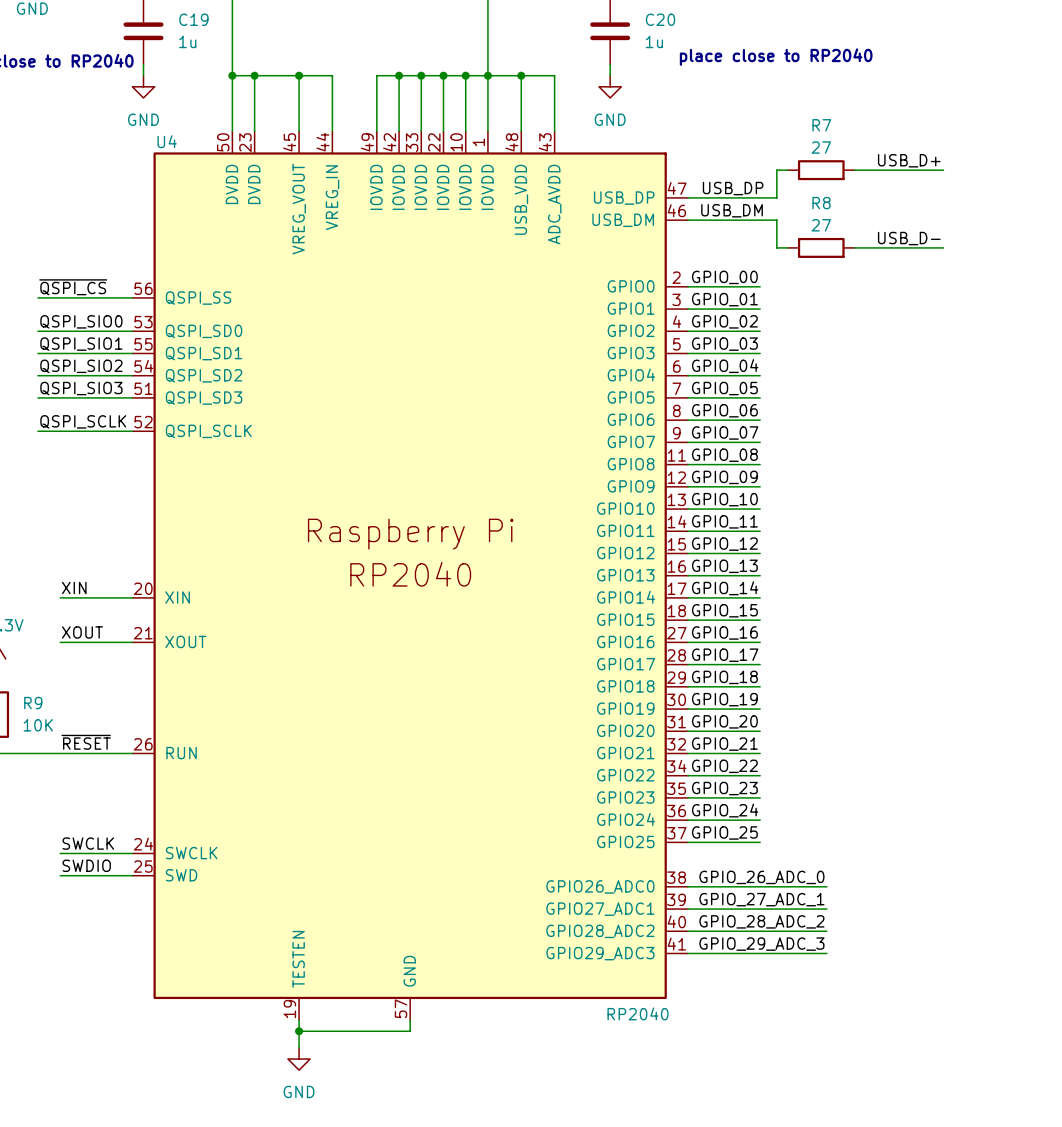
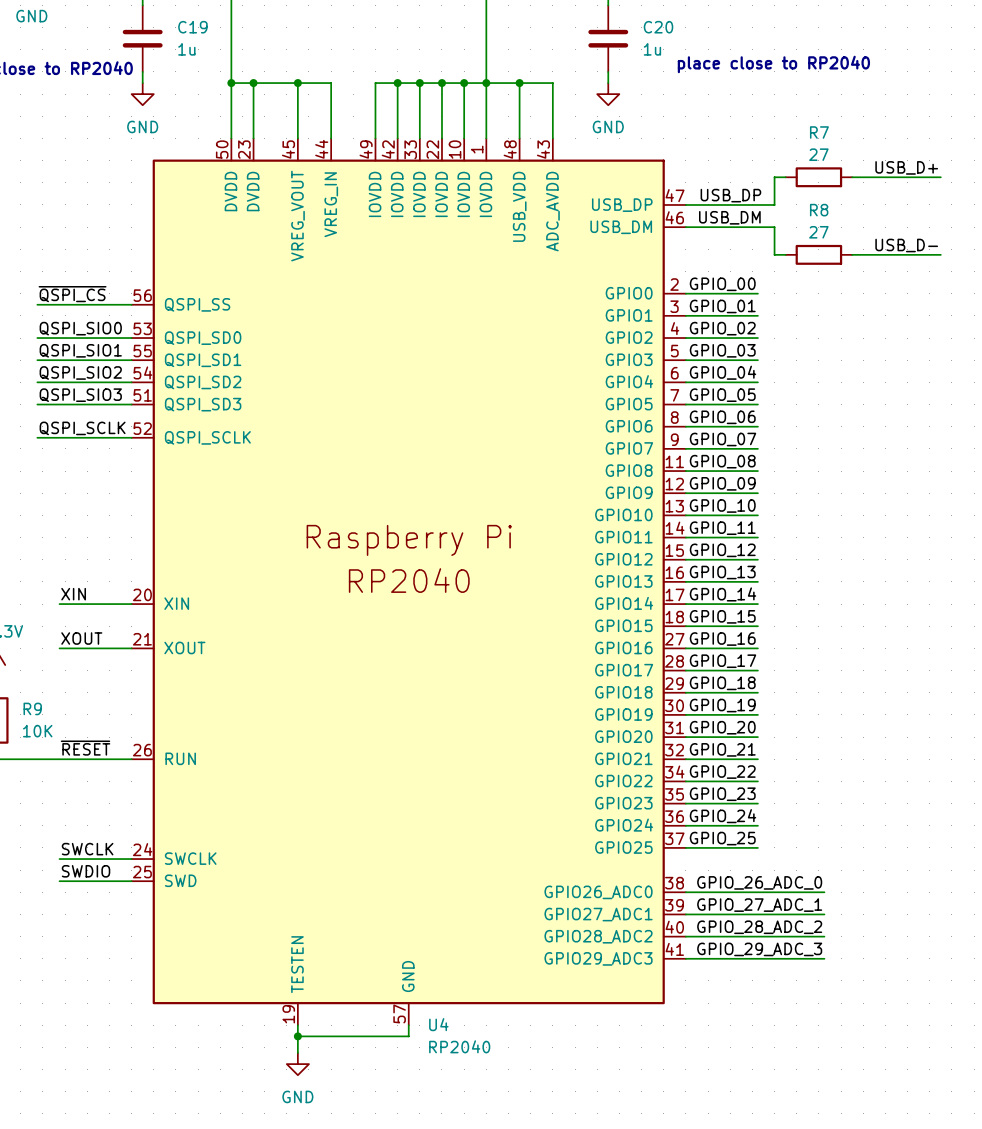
U4 name position: U4 (167, 141) -> U4 (438, 1024)
U4 value position: RP2040 (638, 1013) -> RP2040 (459, 1046)

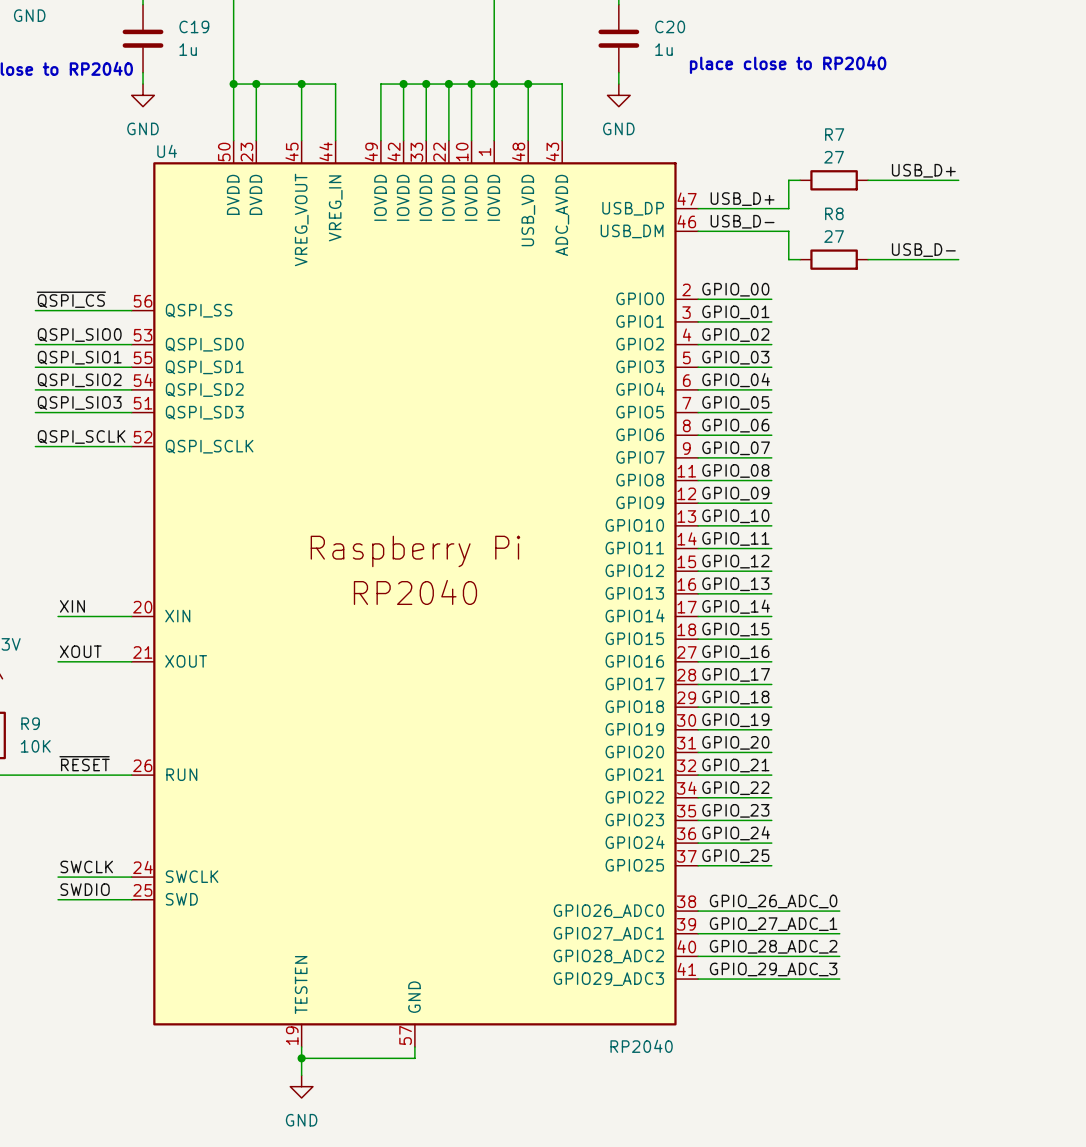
label: USB_DP (730, 195) -> USB_D+ (742, 199)
label: USB_DM (729, 217) -> USB_D- (742, 221)
U4 name position: U4 (438, 1024) -> U4 (167, 151)
U4 value position: RP2040 (459, 1046) -> RP2040 (641, 1046)

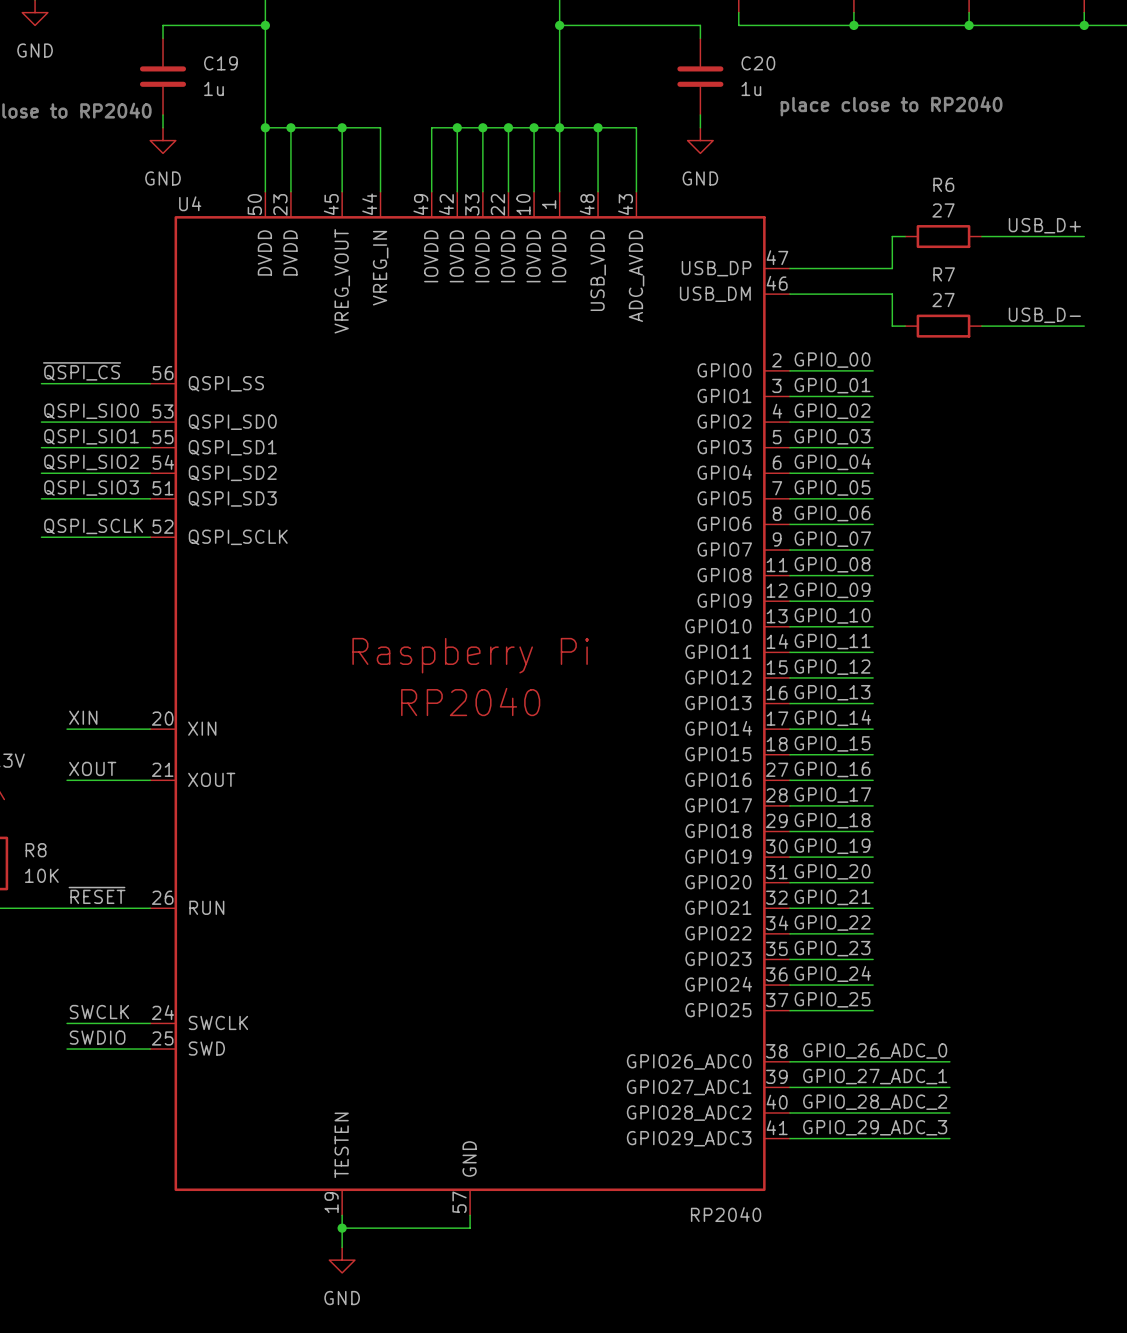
R7 name: R7 (834, 134) -> R6 (943, 184)
label: USB_D+ (742, 199) -> none
R8 name: R8 (834, 213) -> R7 (944, 274)
label: USB_D- (742, 221) -> none
R9 name: R9 (30, 723) -> R8 (36, 850)

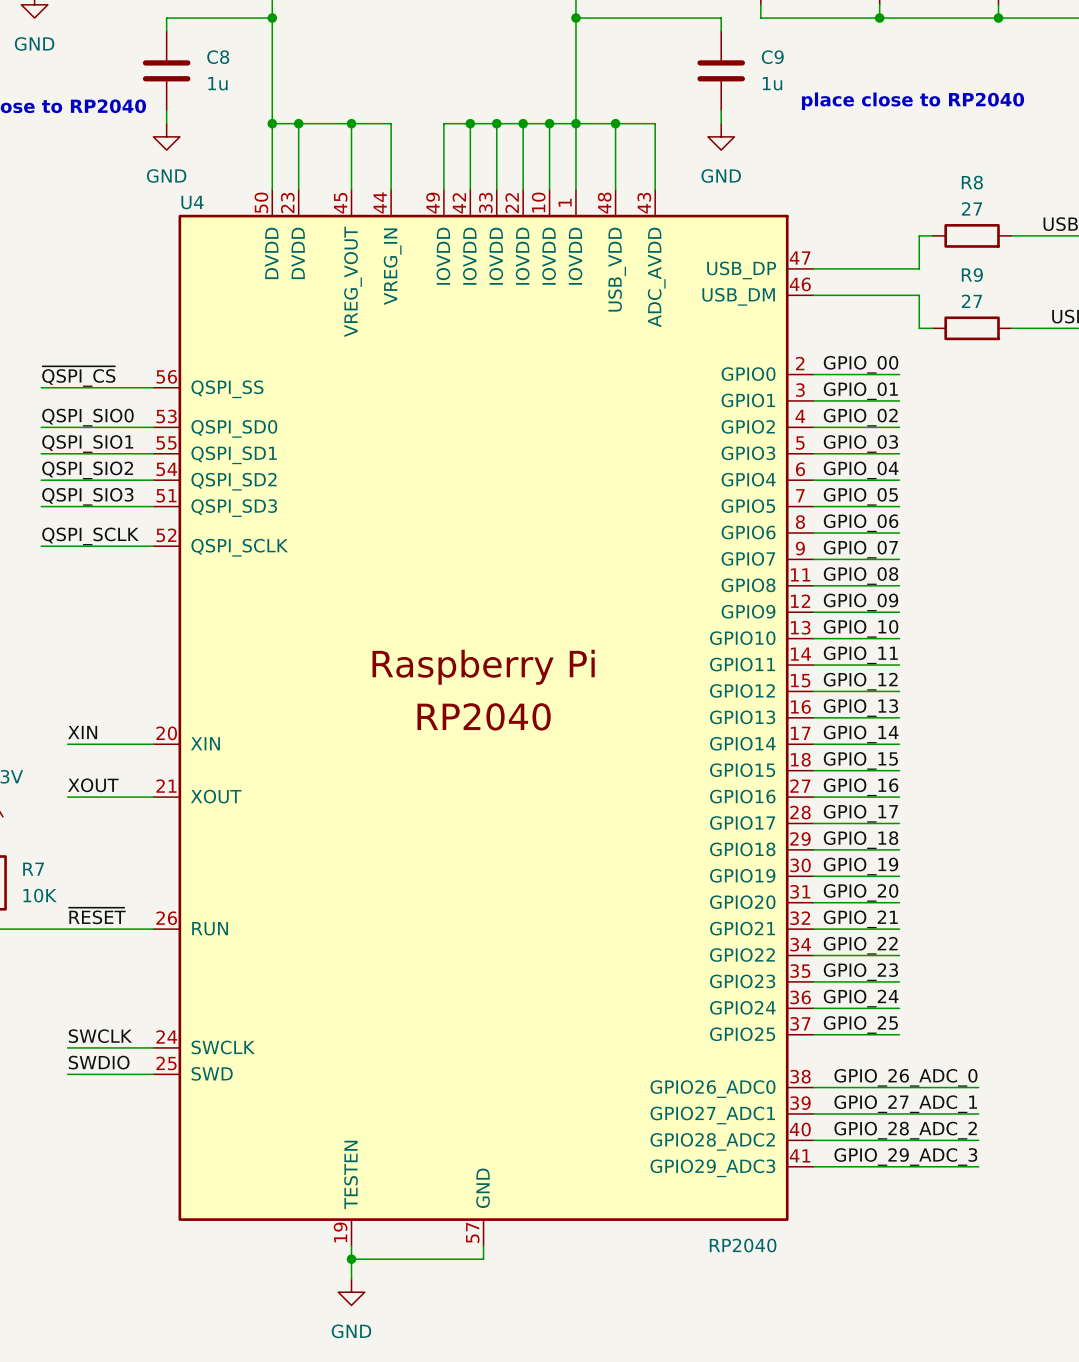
C19 name: C19 (220, 63) -> C8 (218, 57)
C20 name: C20 (758, 63) -> C9 (772, 57)
R6 name: R6 (943, 184) -> R8 (972, 182)
R7 name: R7 (944, 274) -> R9 (972, 275)
R8 name: R8 (36, 850) -> R7 (33, 869)

